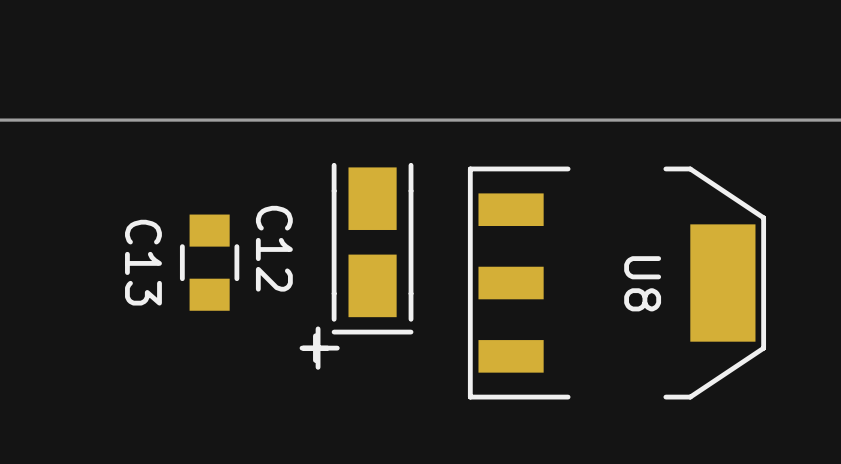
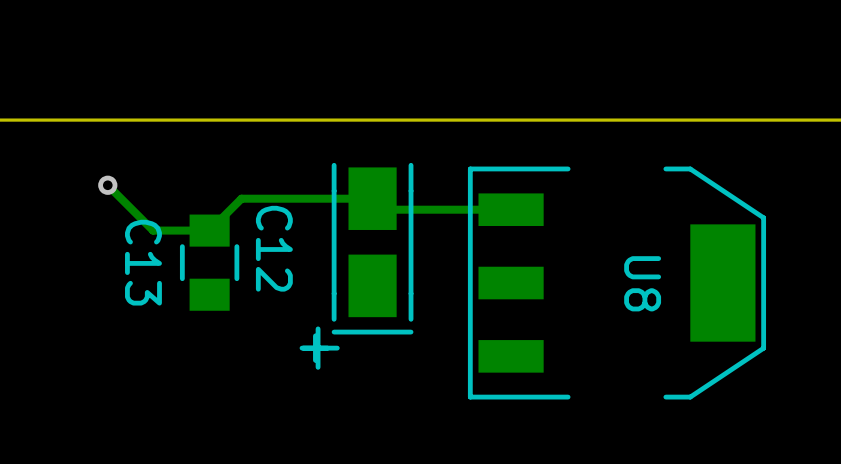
track: none -> (107, 185) (153, 230) (209, 230) (241, 198) (372, 198) (383, 209) (511, 209)
via: none -> (107, 185)

